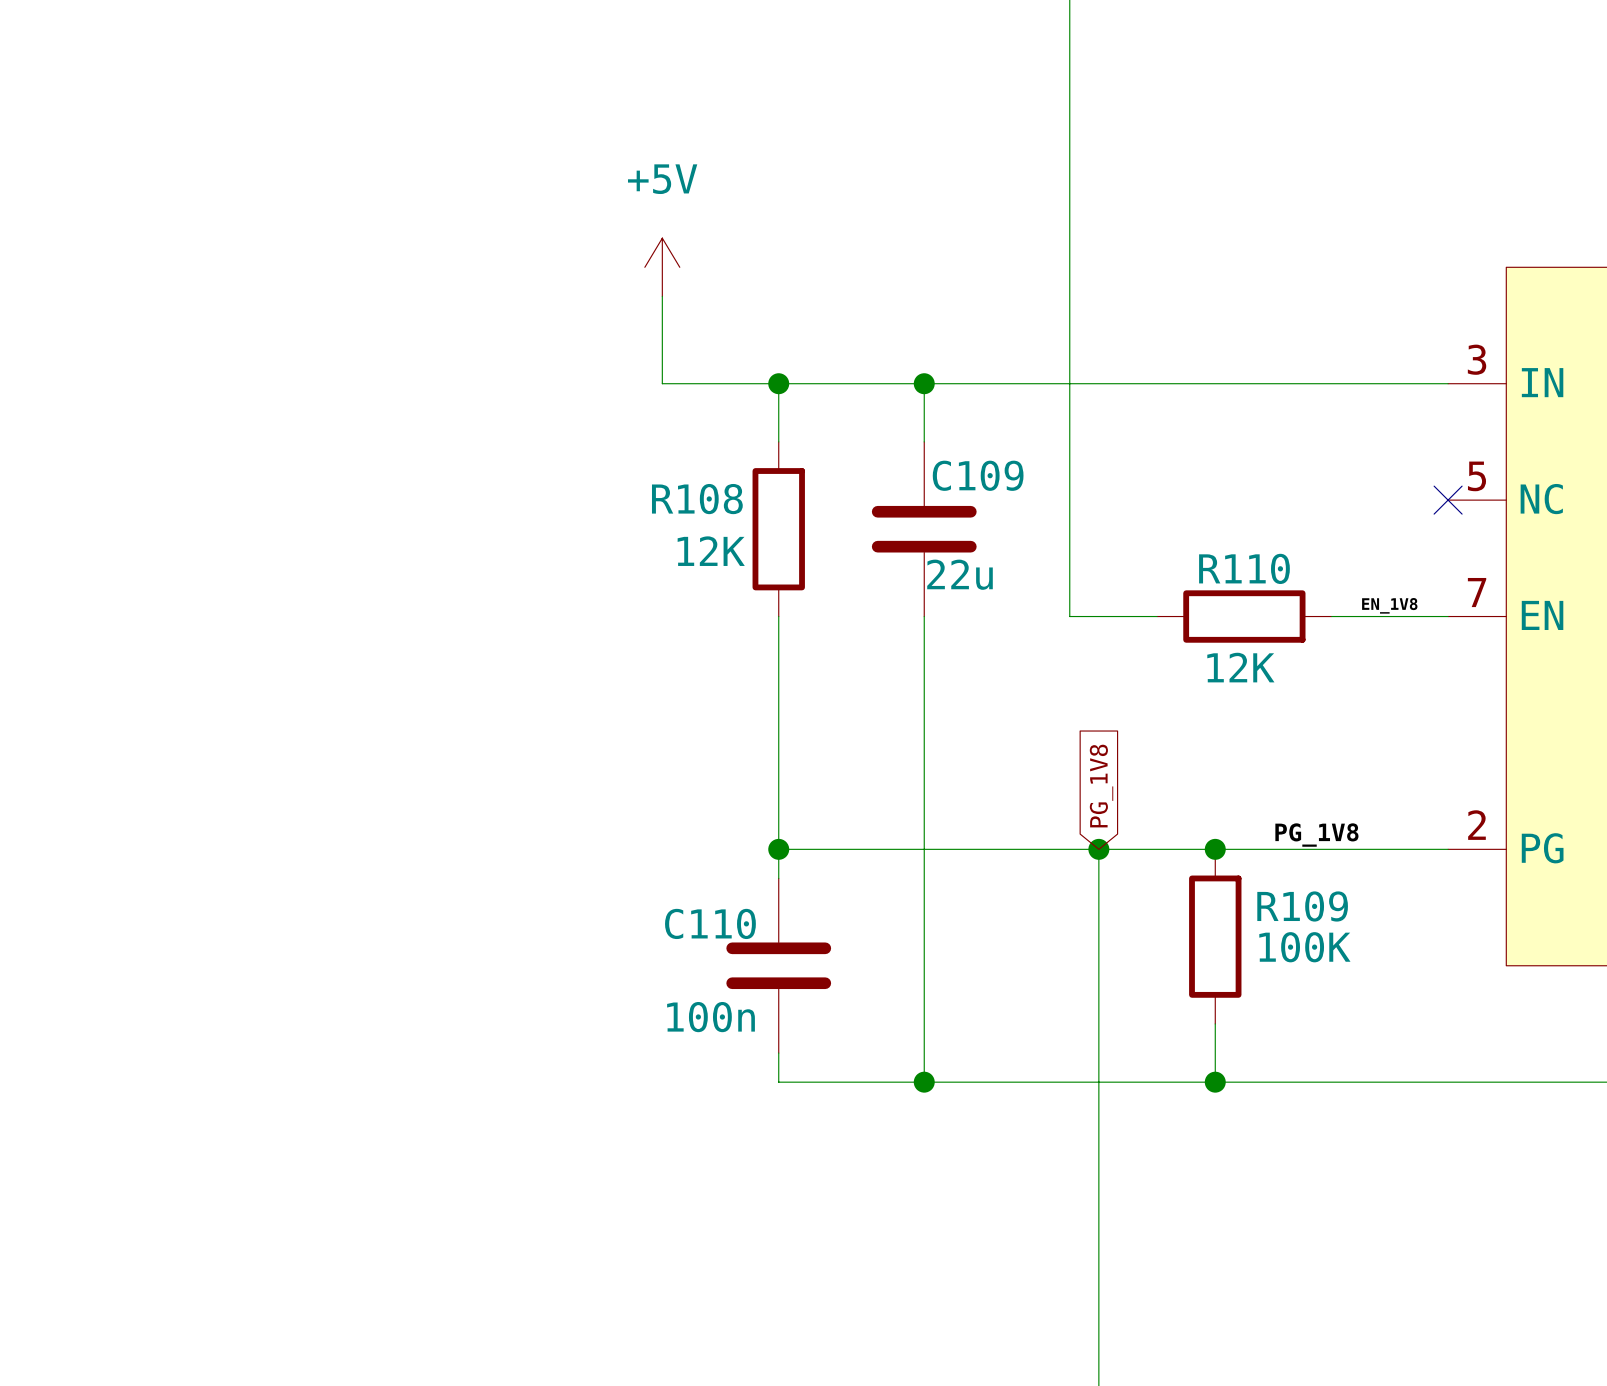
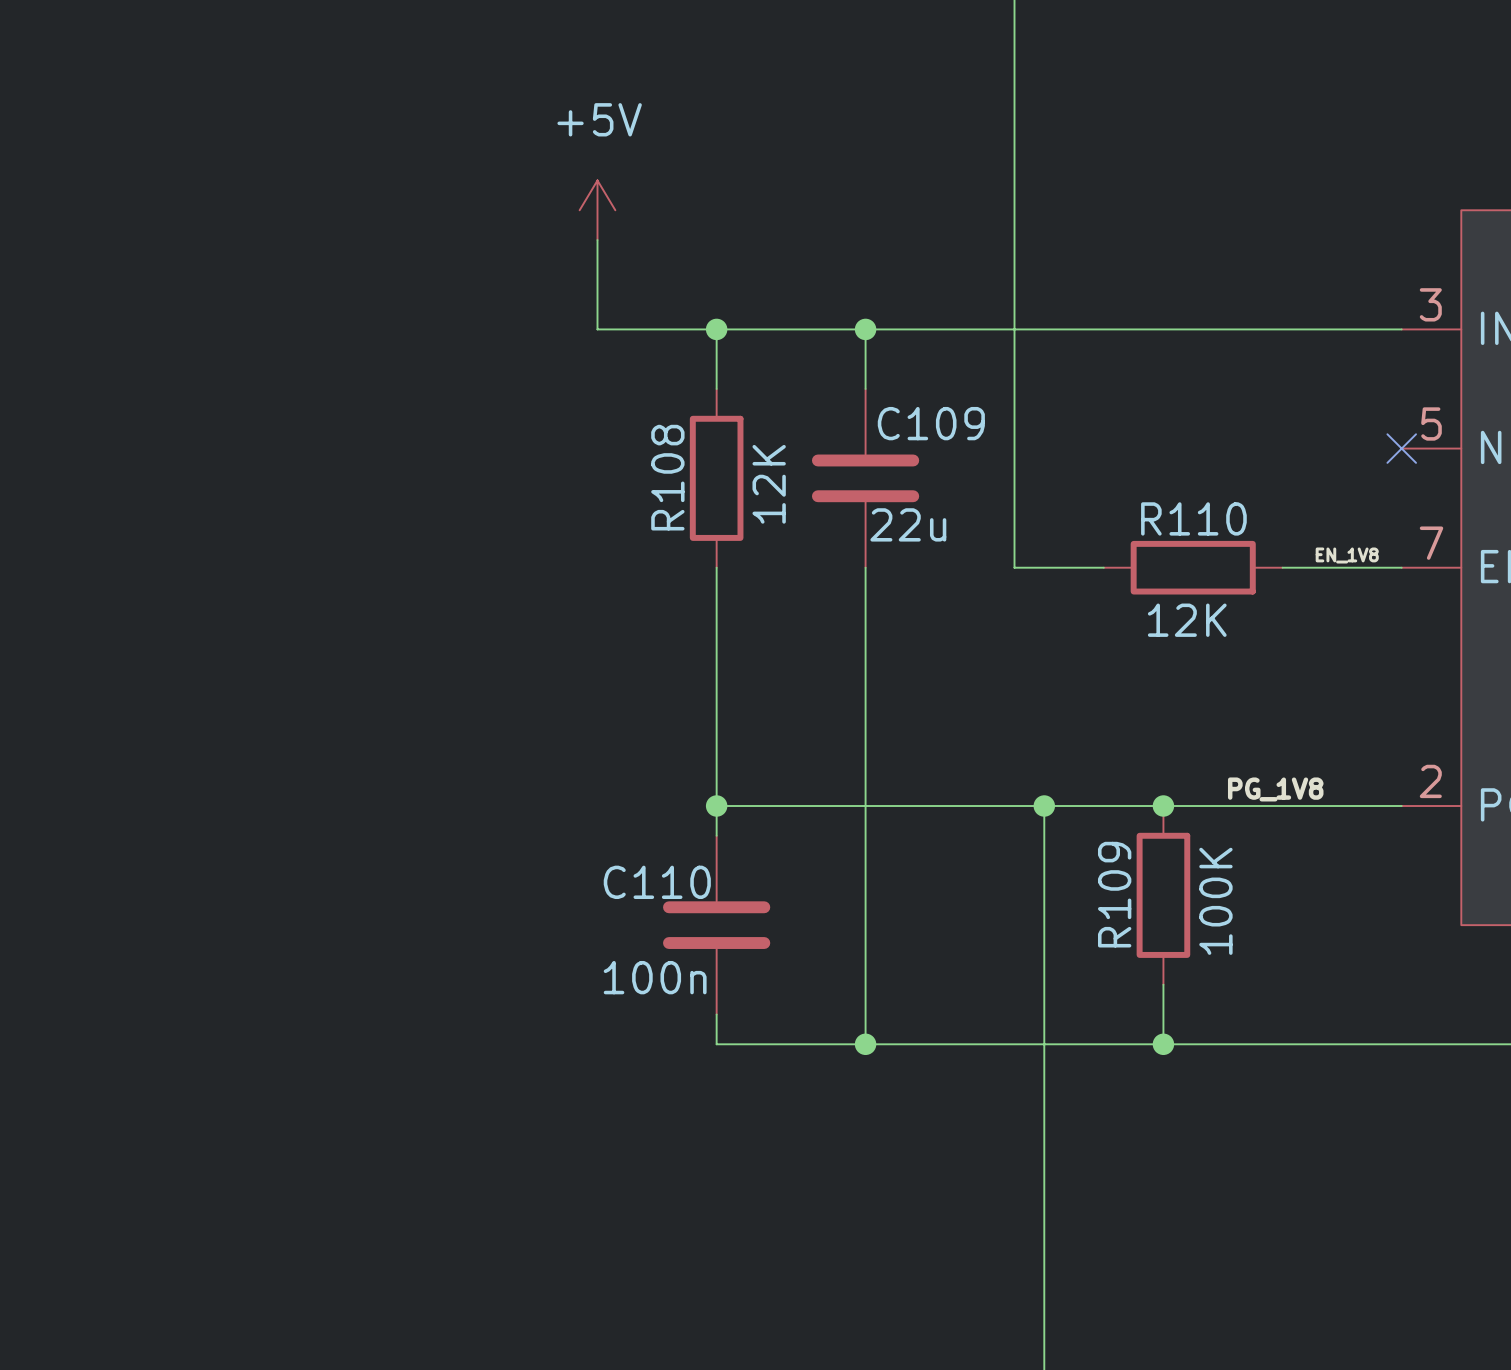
R108 name rotation: 0° (697, 499) -> 90° counterclockwise (667, 477)
R108 value rotation: 0° (711, 551) -> 90° counterclockwise (769, 484)
R108 value position: 12K (711, 551) -> 12K (769, 484)
global label: PG_1V8 (1101, 786) -> none
R109 name rotation: 0° (1302, 906) -> 90° counterclockwise (1114, 894)
R109 name position: R109 (1302, 906) -> R109 (1114, 894)
R109 value rotation: 0° (1304, 947) -> 90° counterclockwise (1215, 901)

